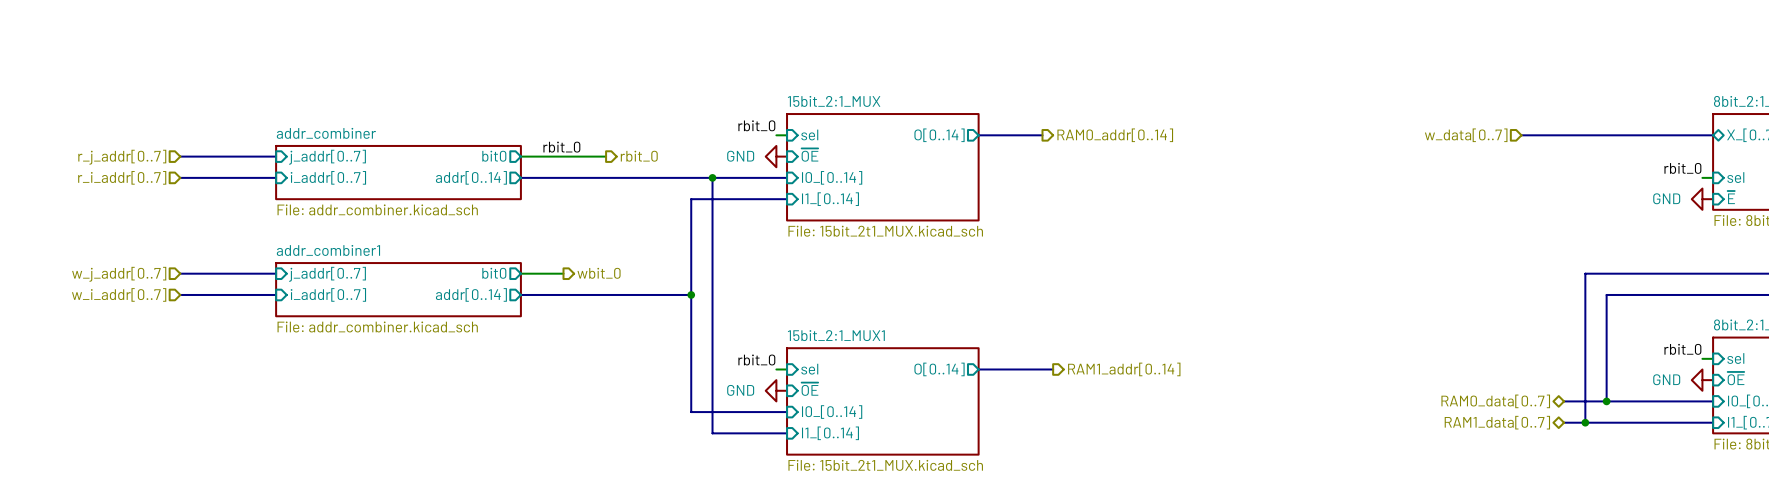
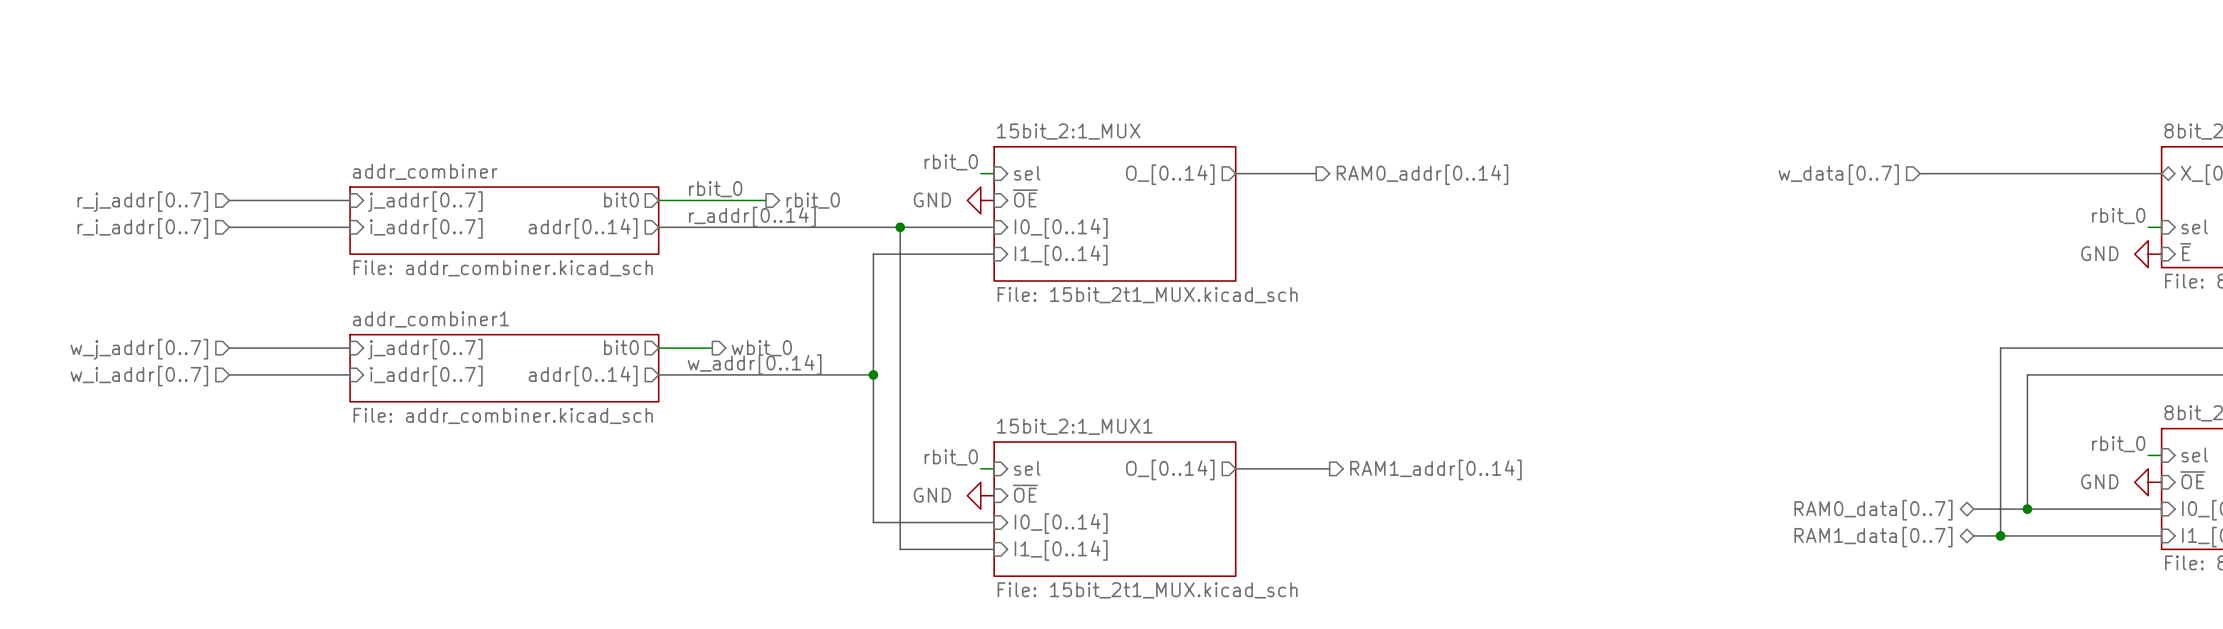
sheet pin: O[0..14] (939, 135) -> O_[0..14] (1170, 174)
label: none -> r_addr[0..14] (752, 216)
label: none -> w_addr[0..14] (754, 364)
sheet pin: O[0..14] (939, 369) -> O_[0..14] (1170, 469)

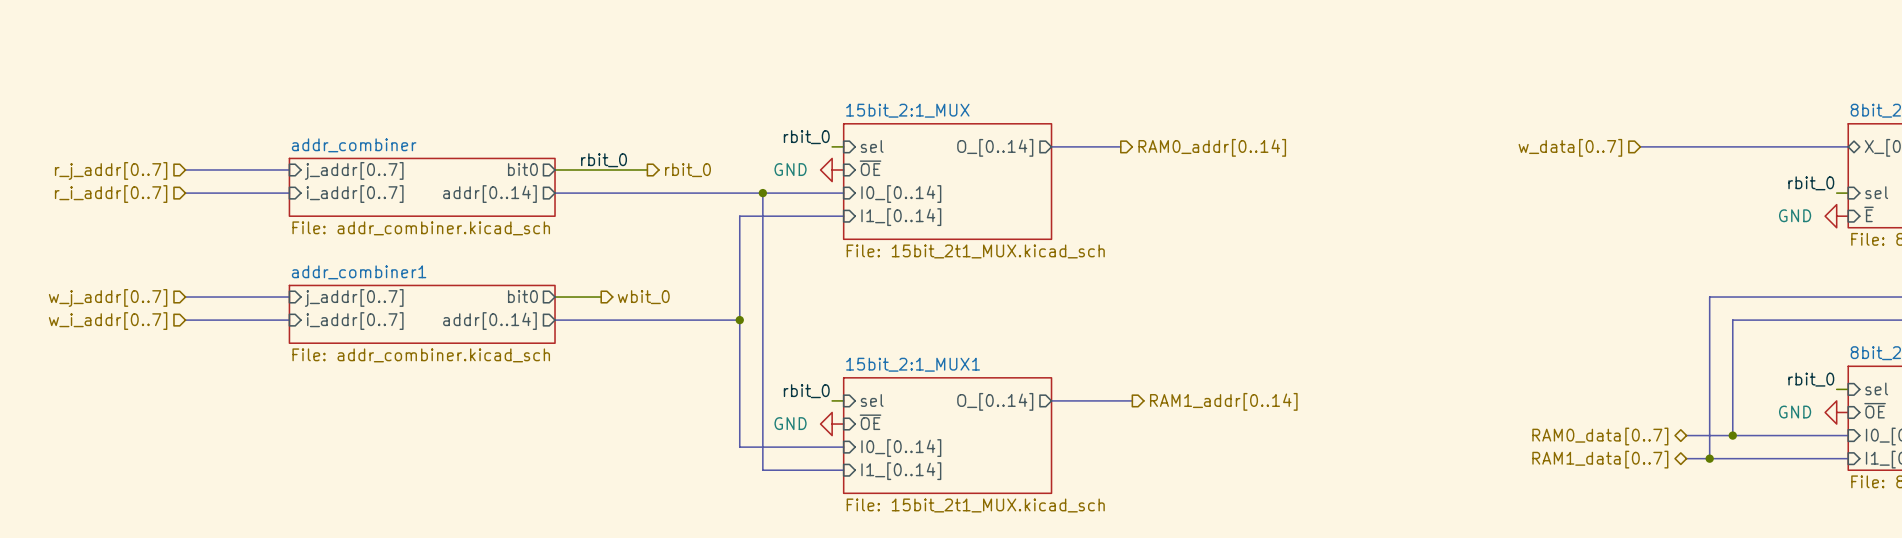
label: r_addr[0..14] (752, 216) -> none
label: w_addr[0..14] (754, 364) -> none

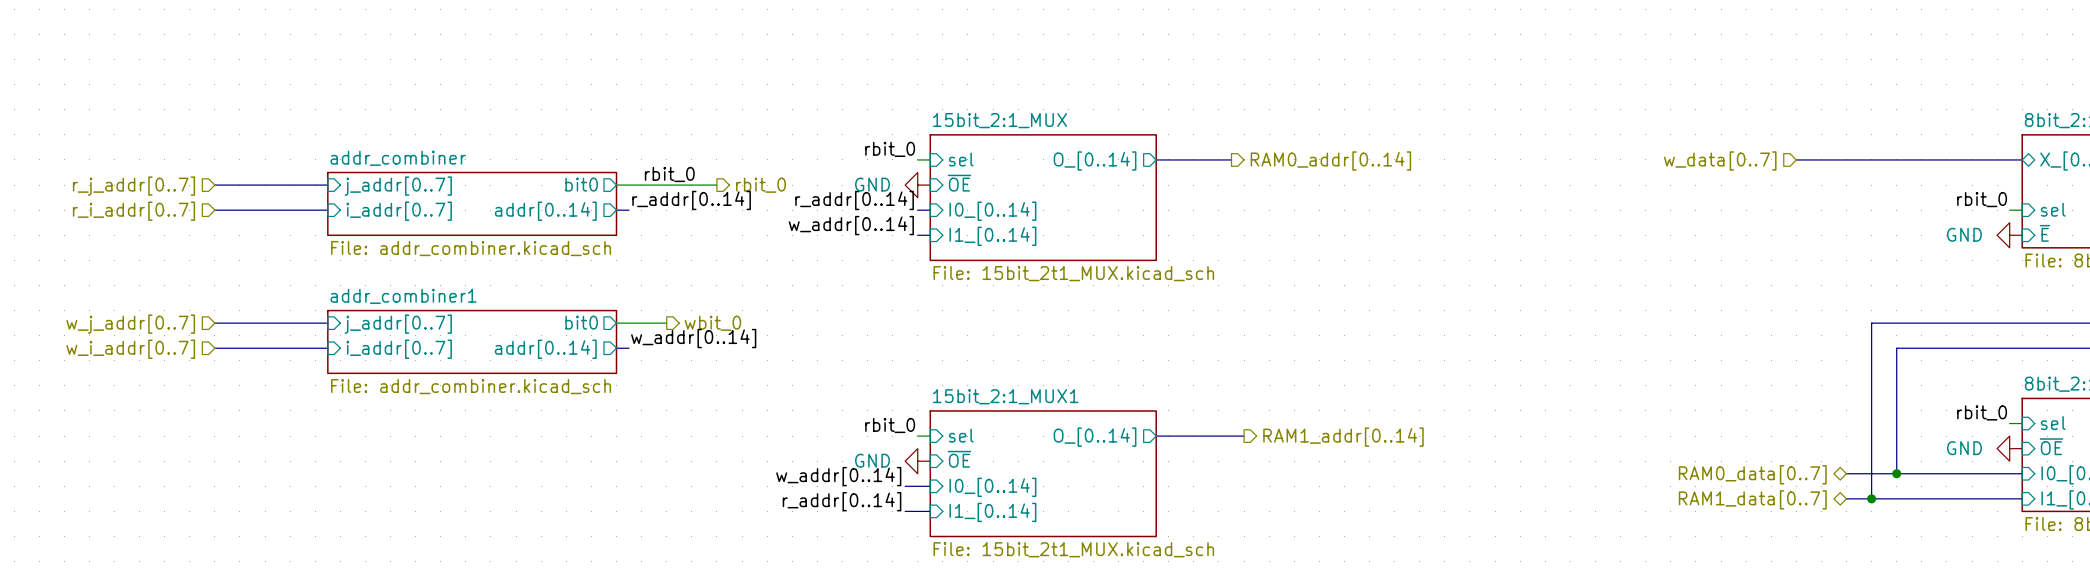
label: none -> r_addr[0..14] (691, 200)
label: none -> r_addr[0..14] (854, 200)
bus: (566, 193) (832, 193) -> none
bus: (762, 193) (762, 470) (820, 470) -> none
junction: (762, 193) -> none
label: none -> w_addr[0..14] (851, 225)
bus: (832, 216) (739, 216) (739, 447) (820, 447) -> none
label: none -> w_addr[0..14] (693, 338)
bus: (566, 320) (739, 320) -> none
junction: (739, 320) -> none
label: none -> w_addr[0..14] (838, 476)
label: none -> r_addr[0..14] (842, 501)

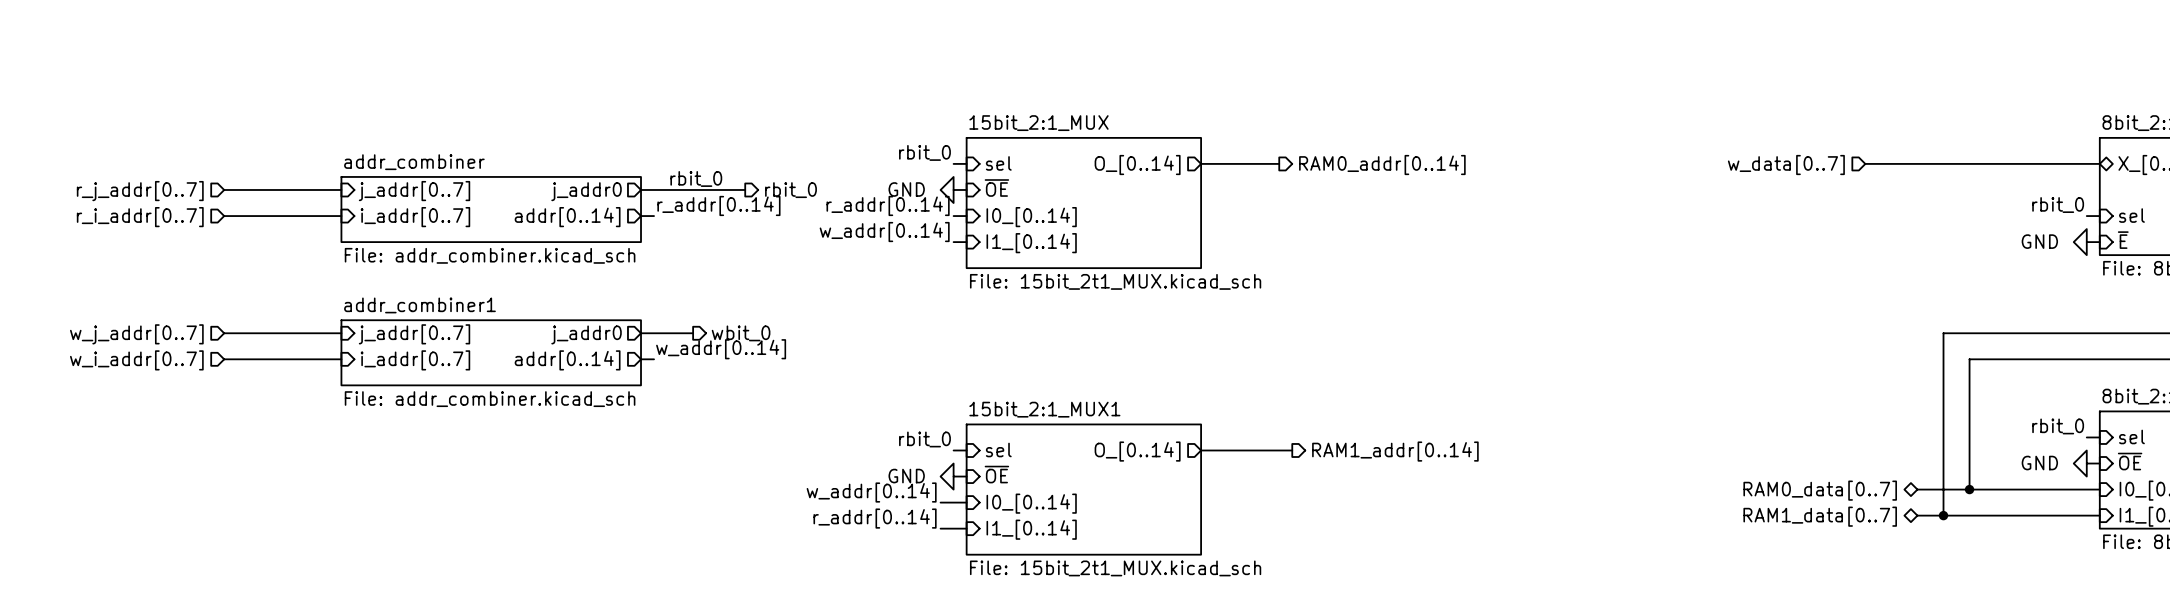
sheet pin: bit0 (581, 184) -> j_addr0 (586, 191)
sheet pin: bit0 (581, 322) -> j_addr0 (586, 334)

